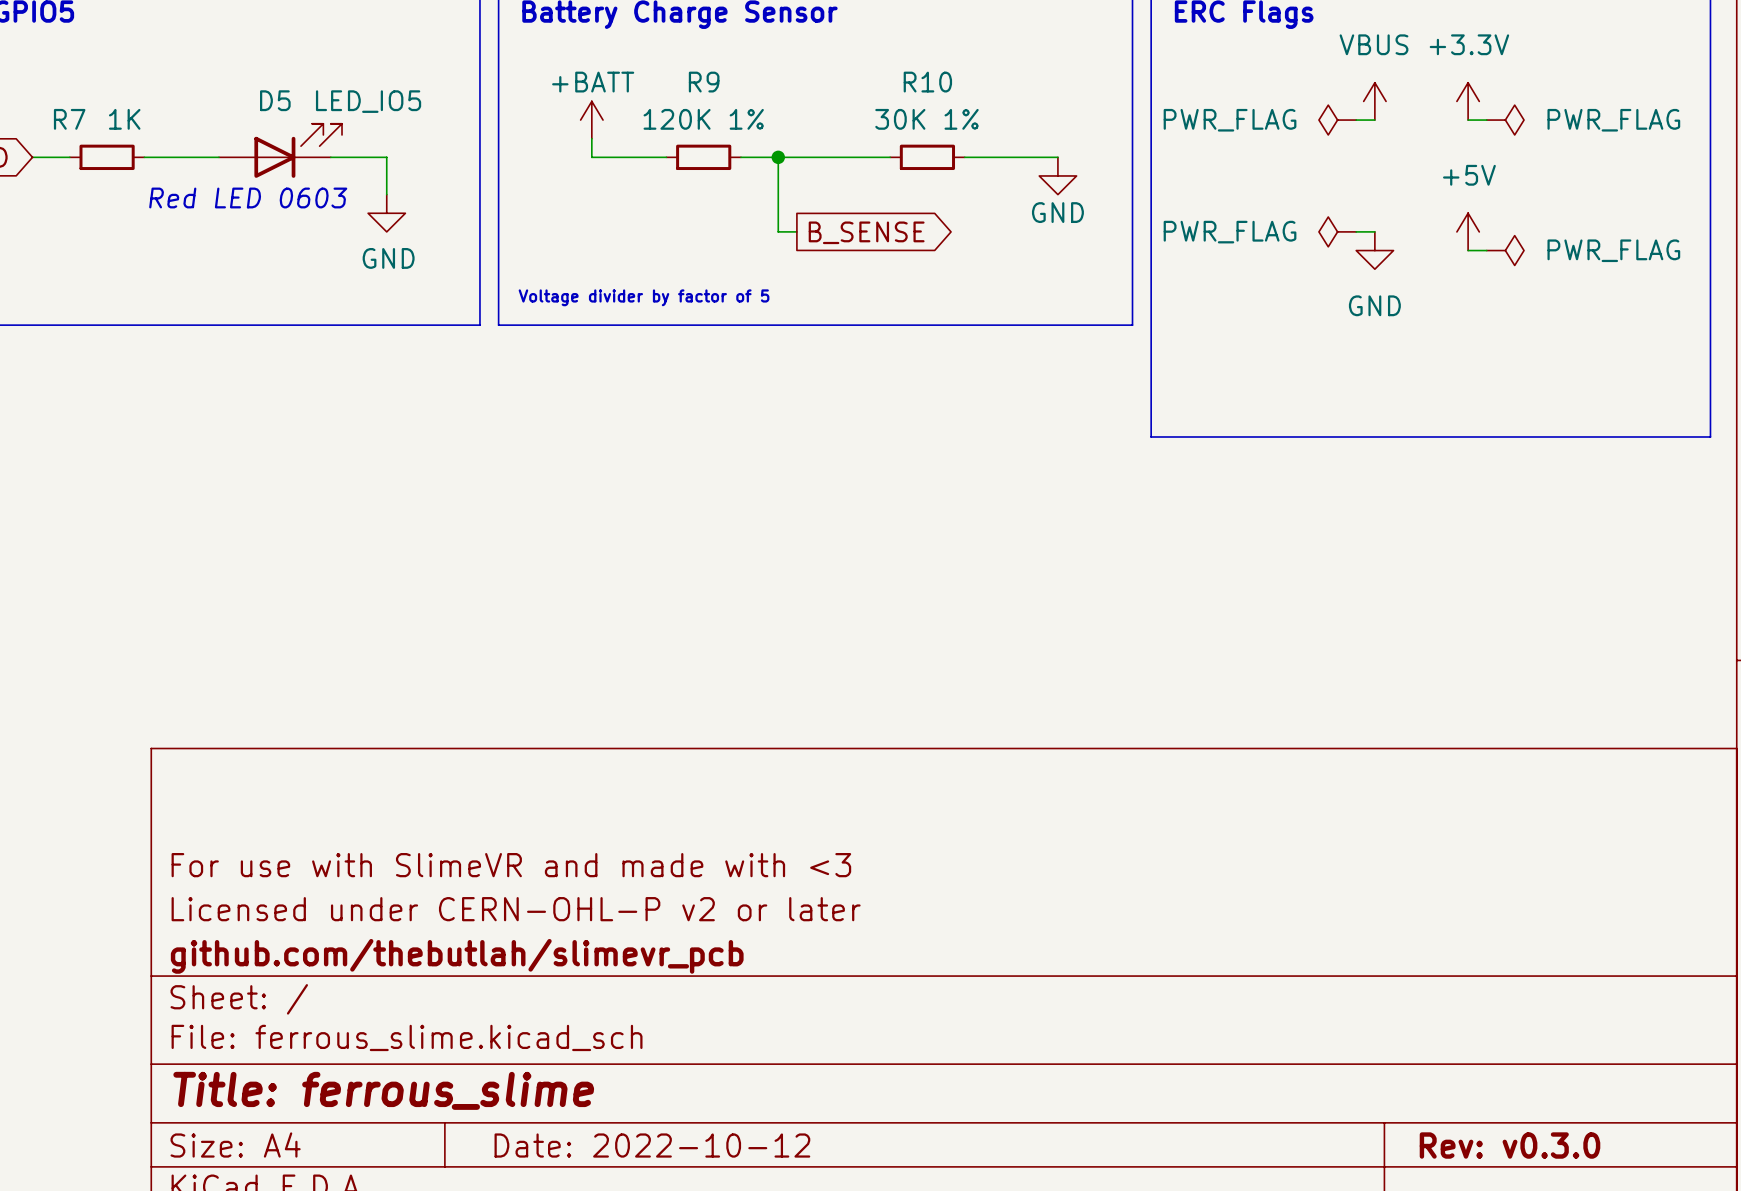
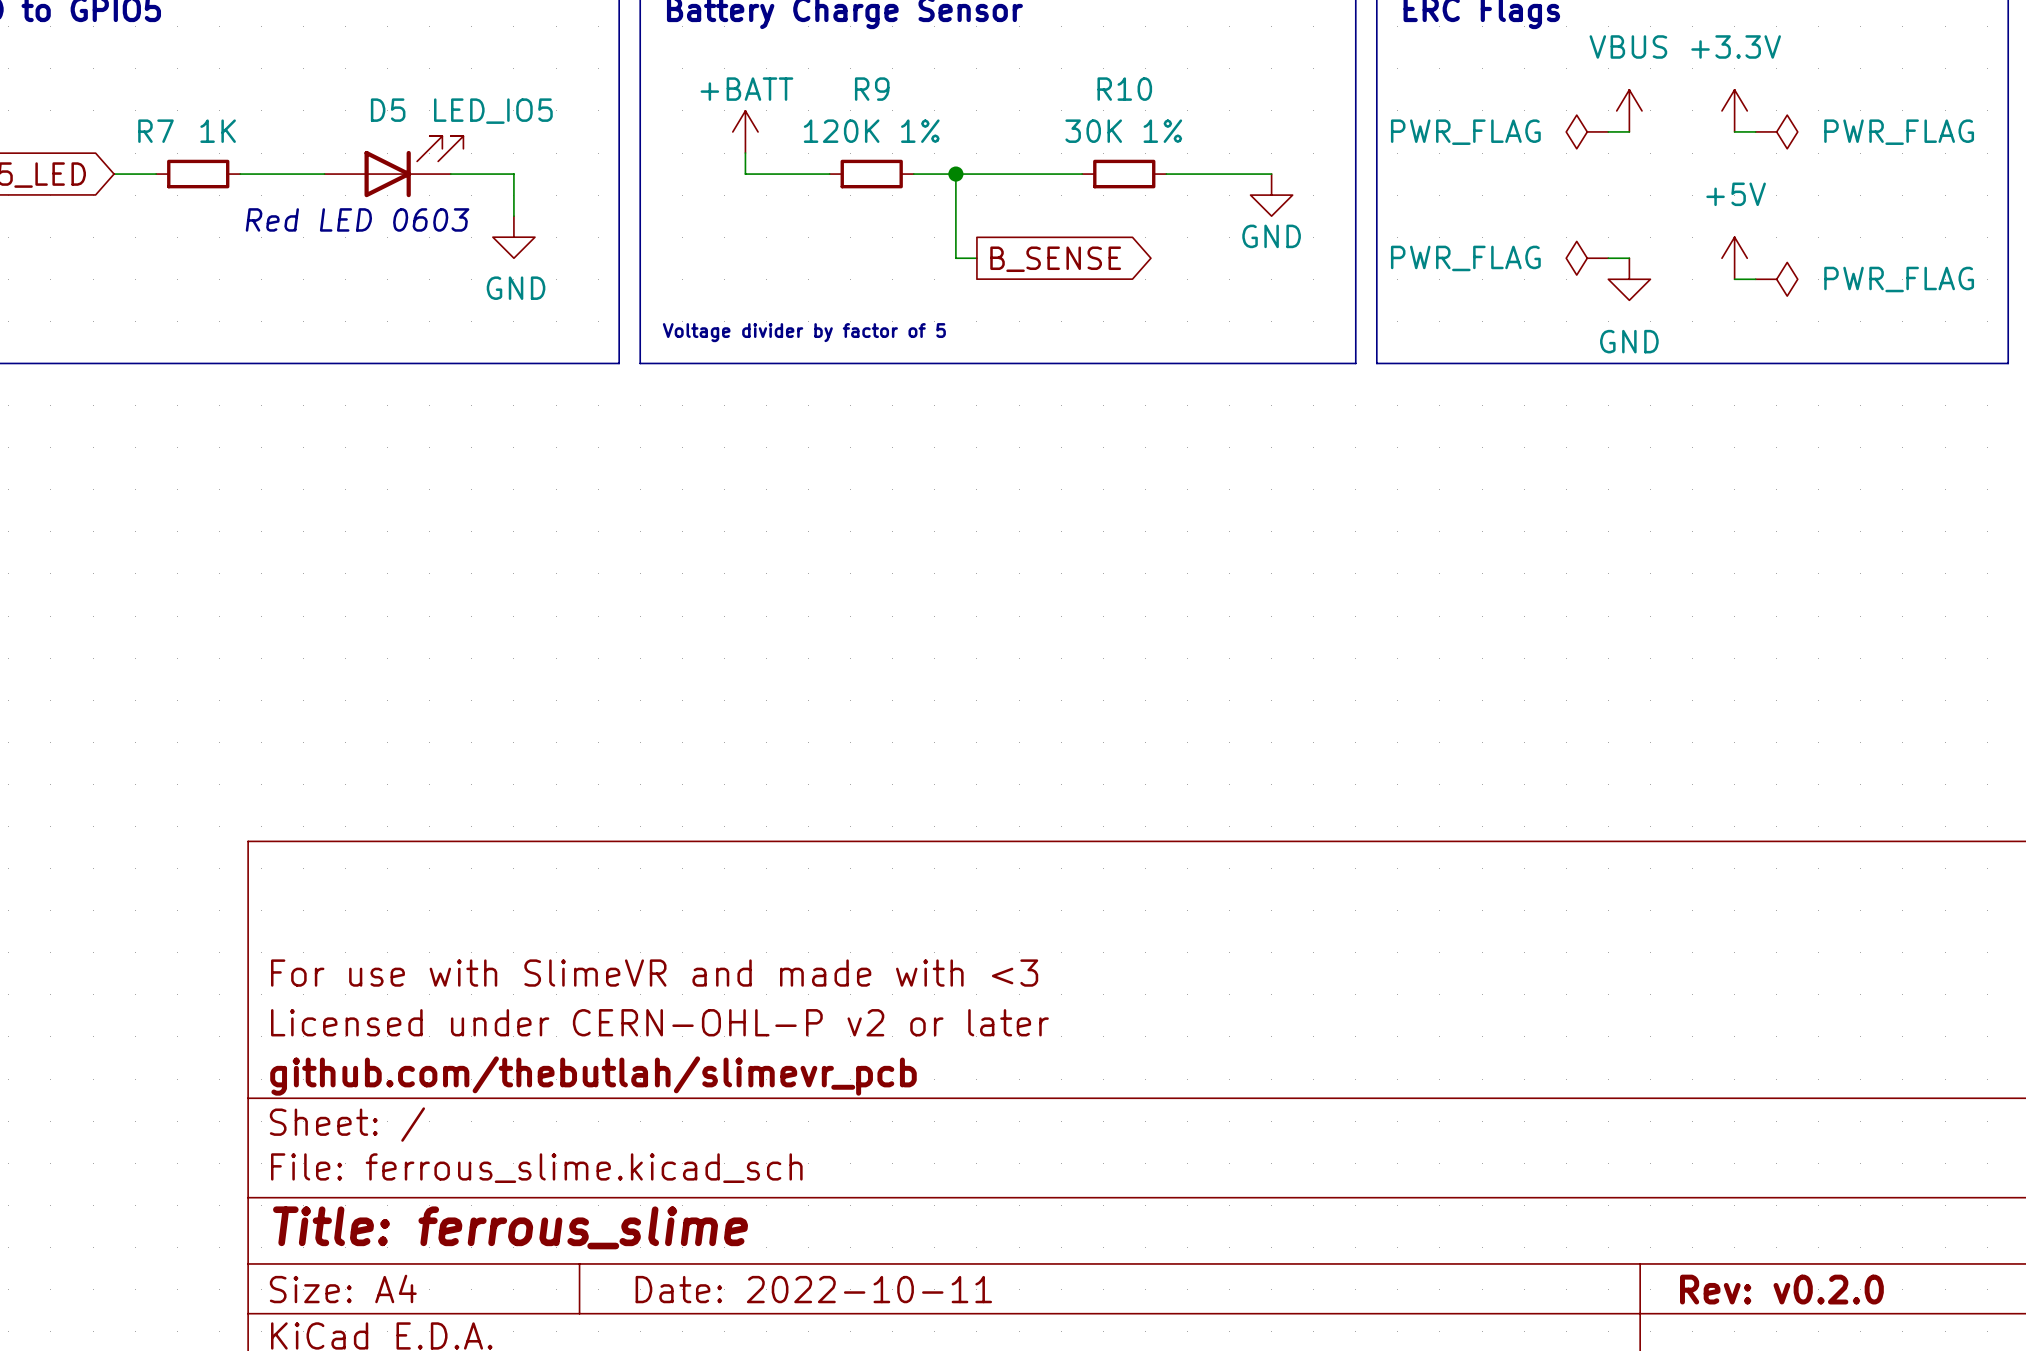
line: (1151, 325) (1151, 436) (1710, 436) (1710, 325) -> (1376, 363) (2008, 363)
title block: Date: 2022-10-12 (652, 1145) -> Date: 2022-10-11 (813, 1289)
title block: Rev: v0.3.0 (1510, 1145) -> Rev: v0.2.0 (1781, 1289)

